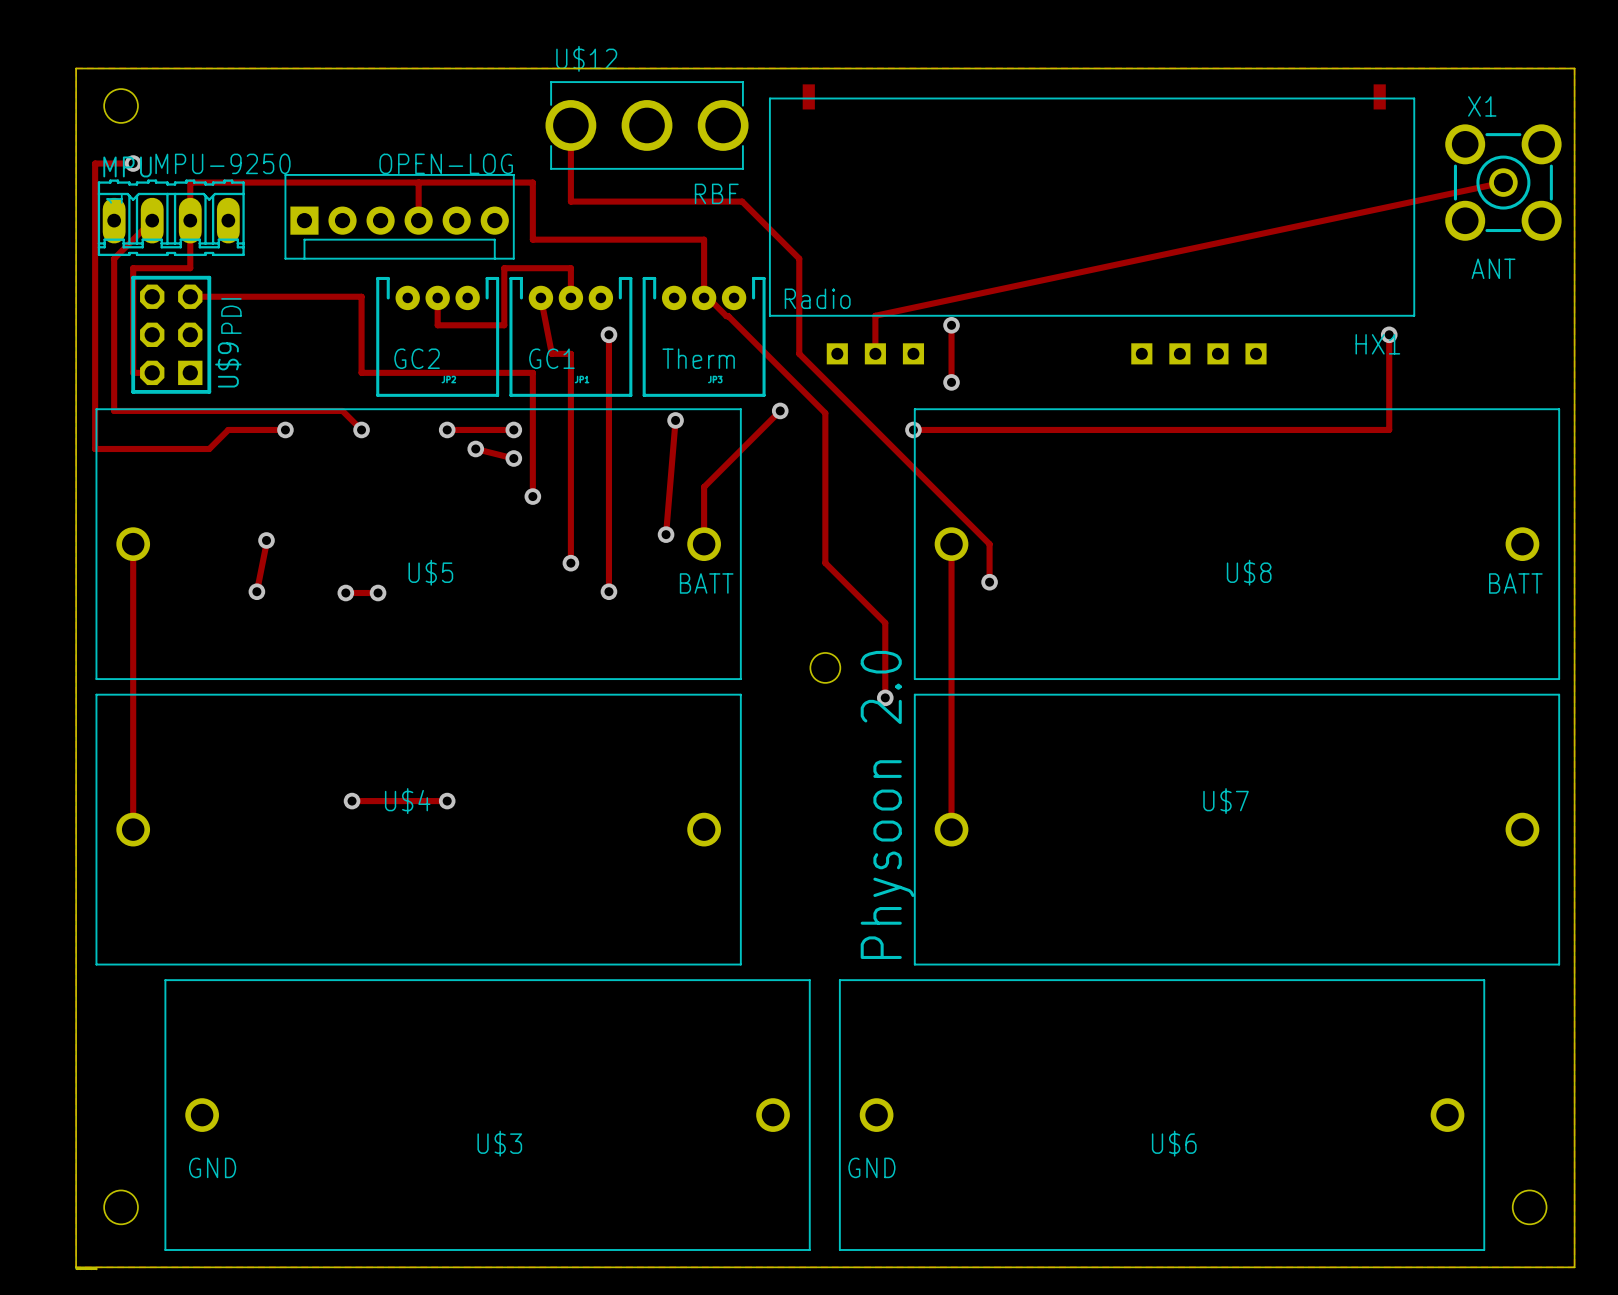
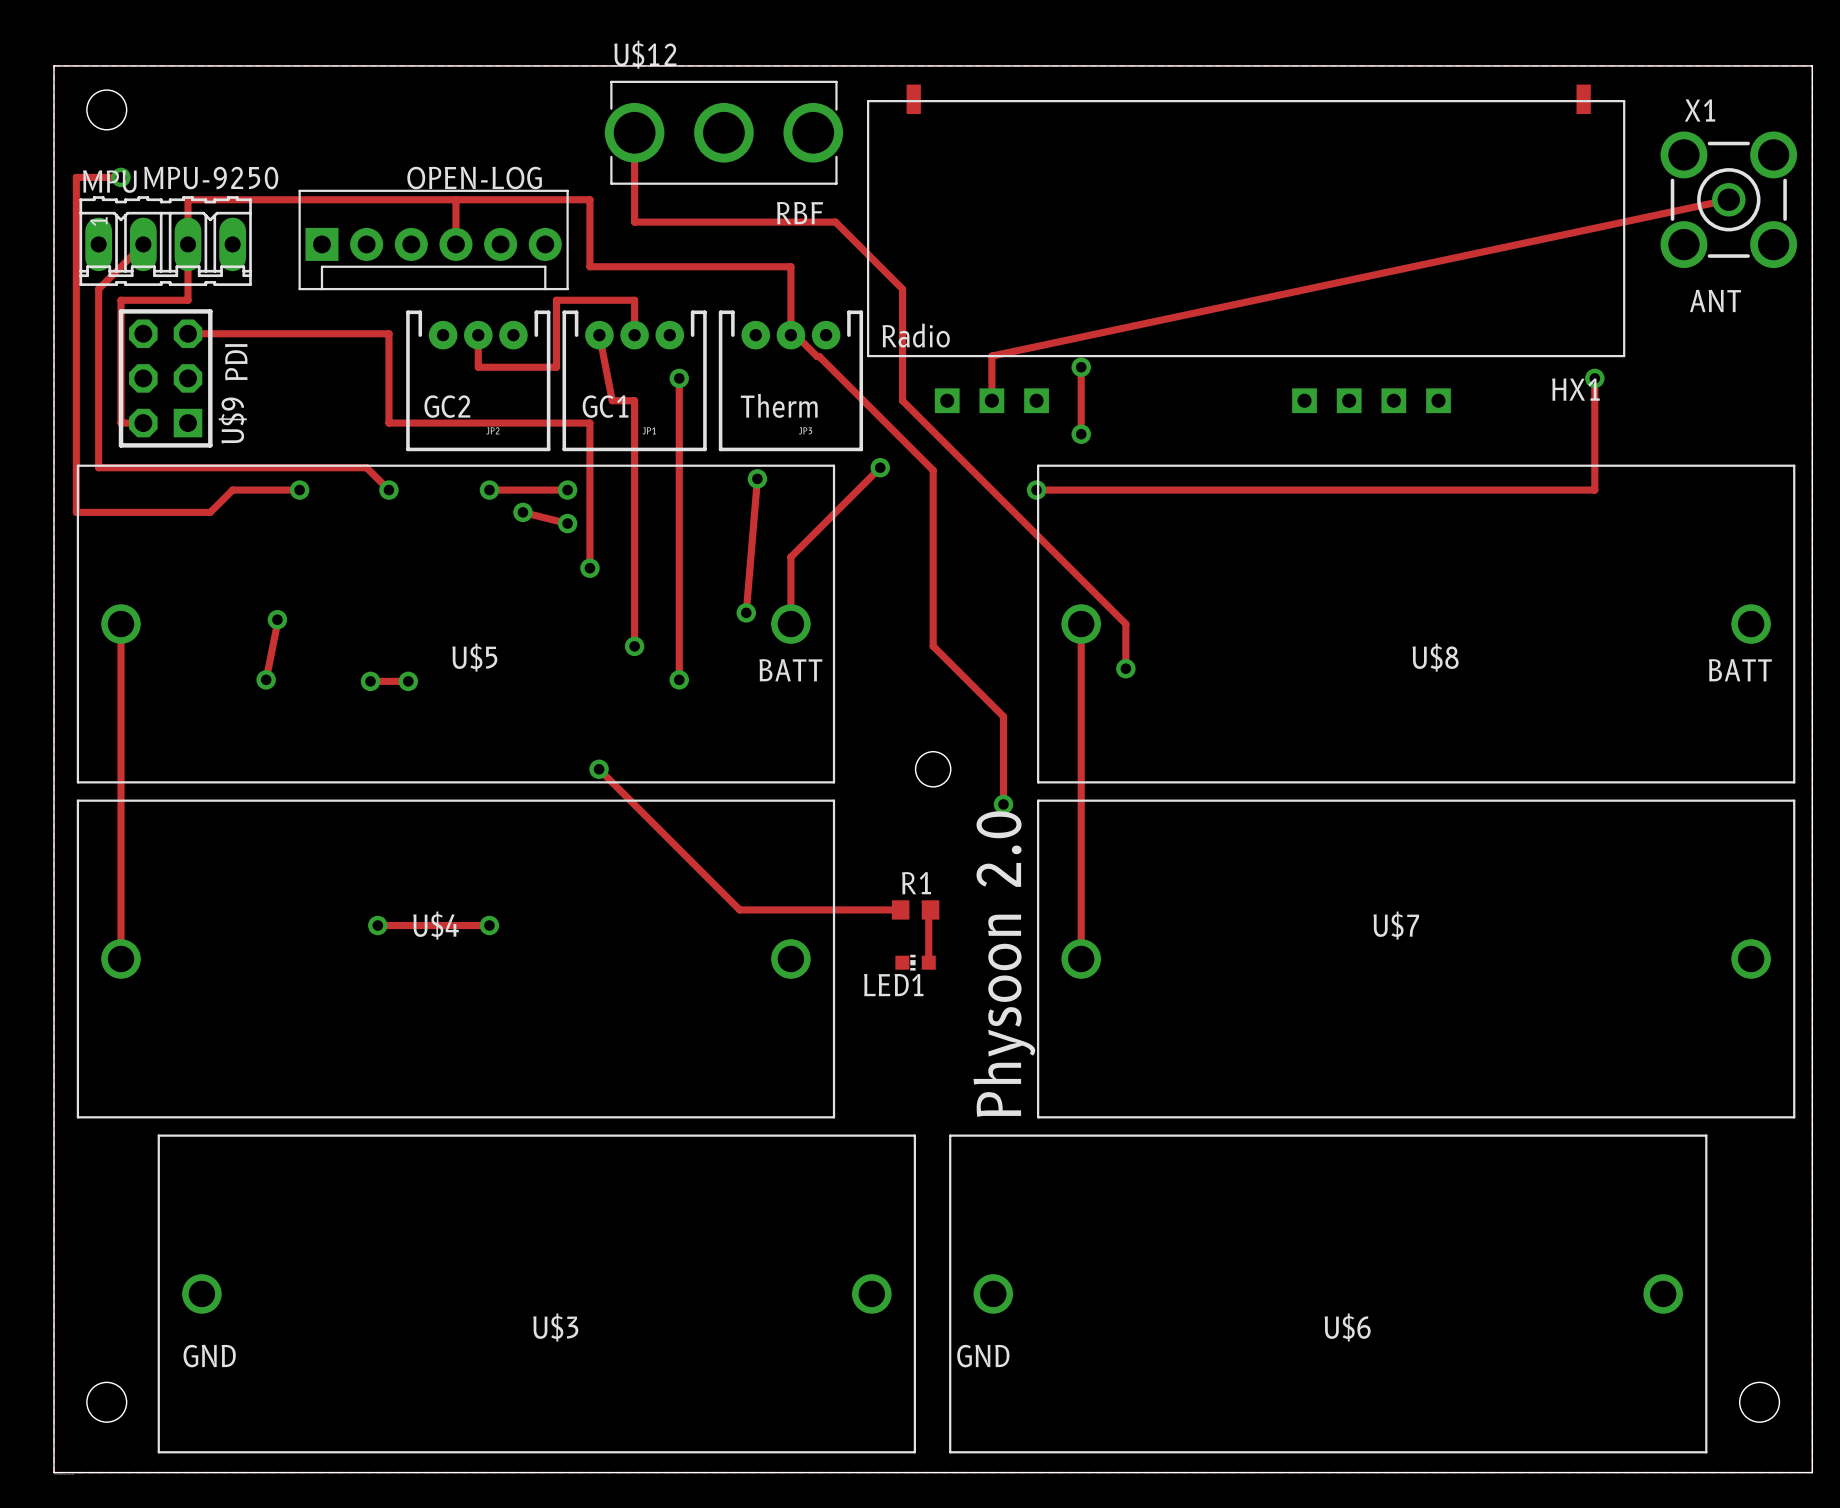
track: none -> (599, 769) (739, 909) (900, 909)
via: none -> (599, 769)
R1: none -> (915, 909)
track: none -> (930, 909) (928, 909) (928, 962)
LED1: none -> (915, 962)

